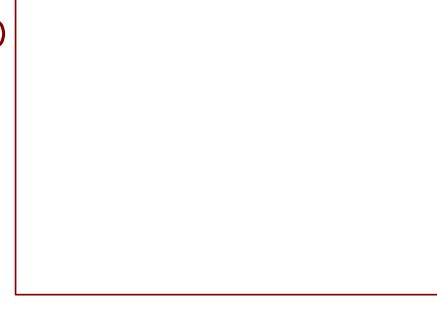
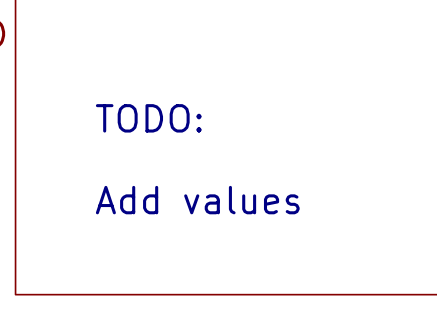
text: none -> TODO: (148, 118)
text: none -> Add values (197, 200)

